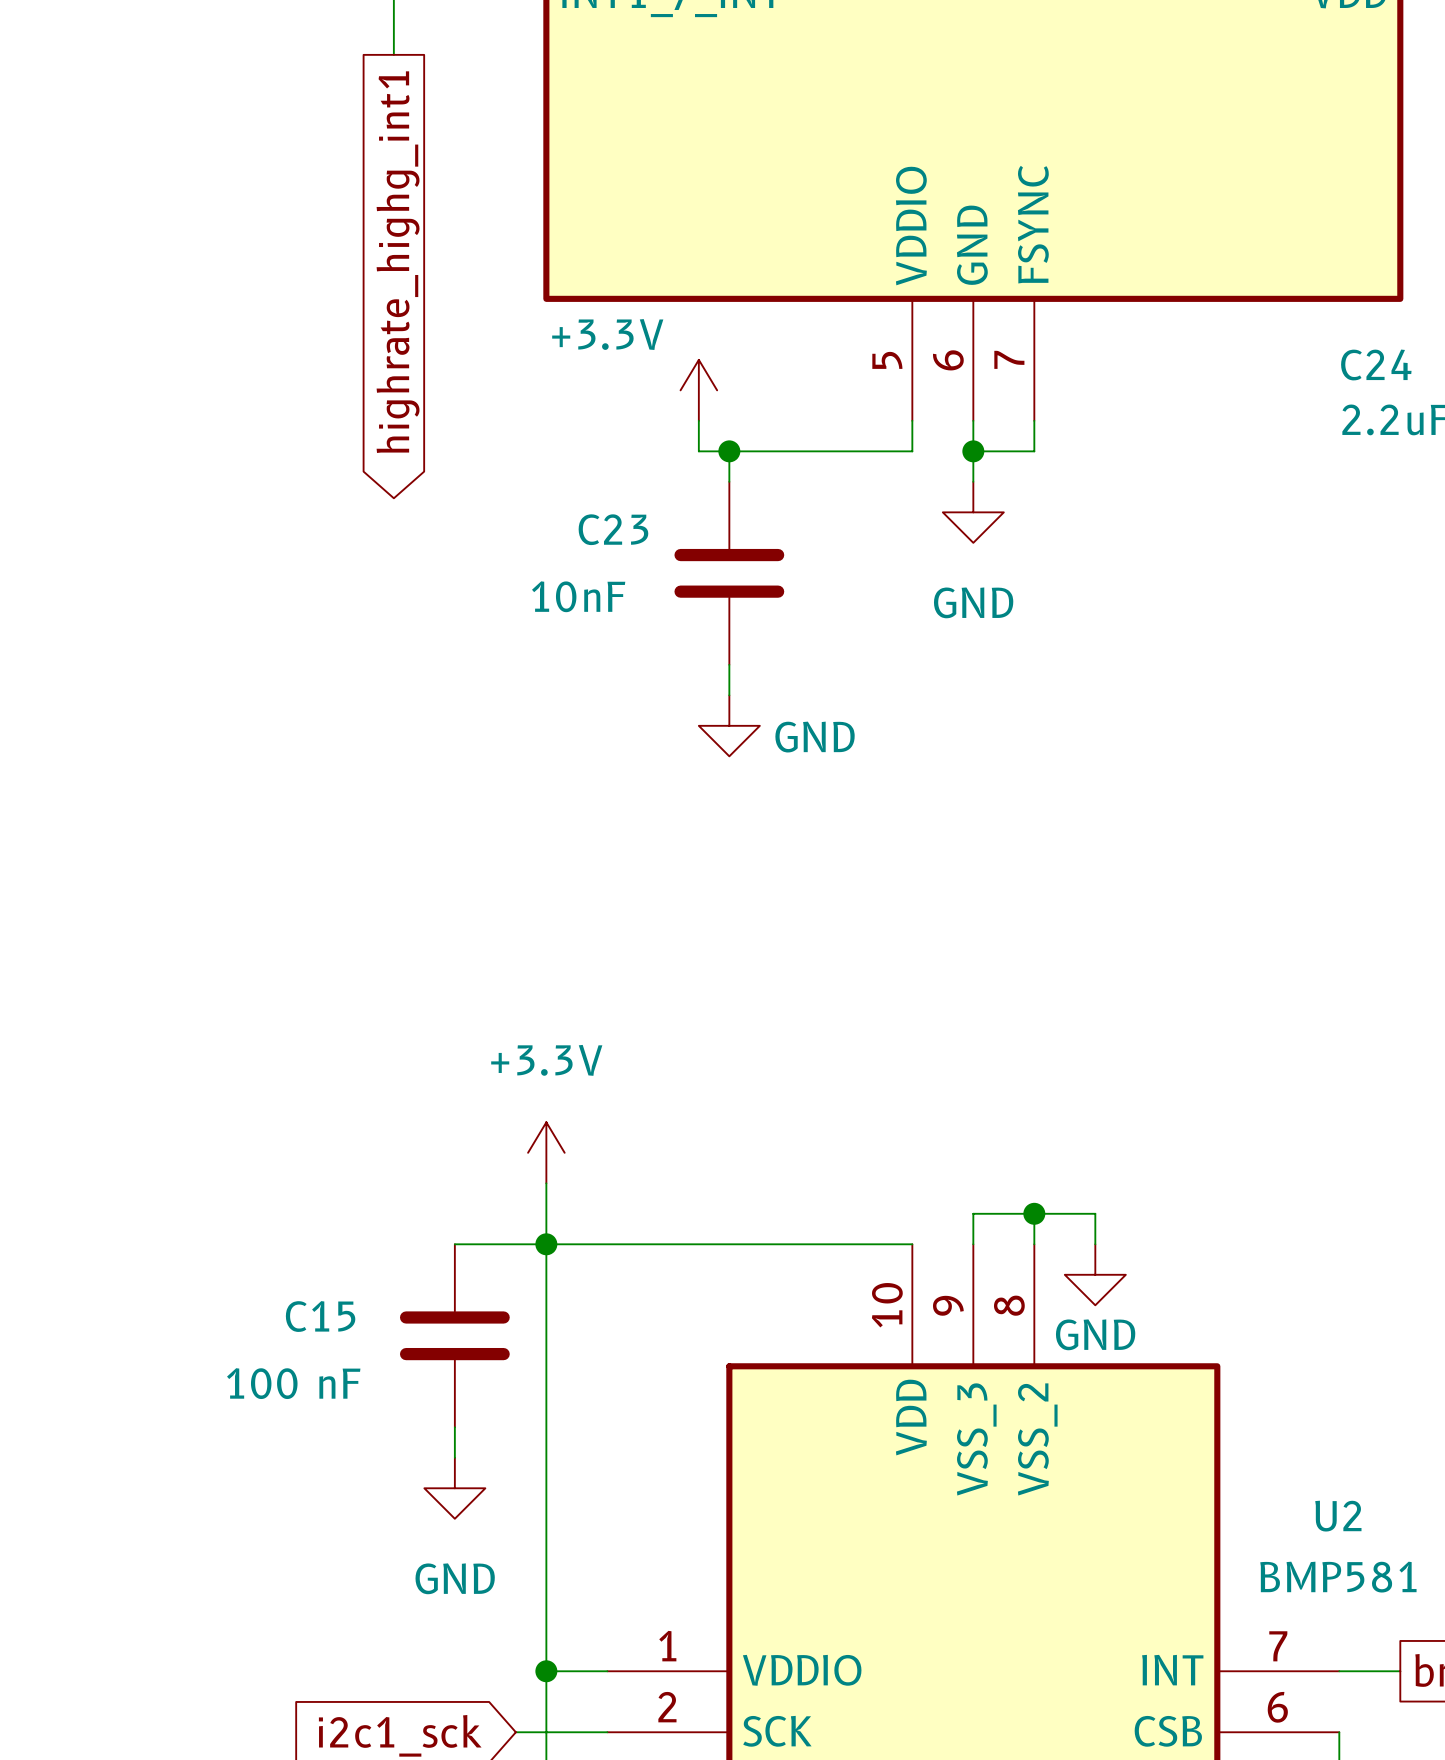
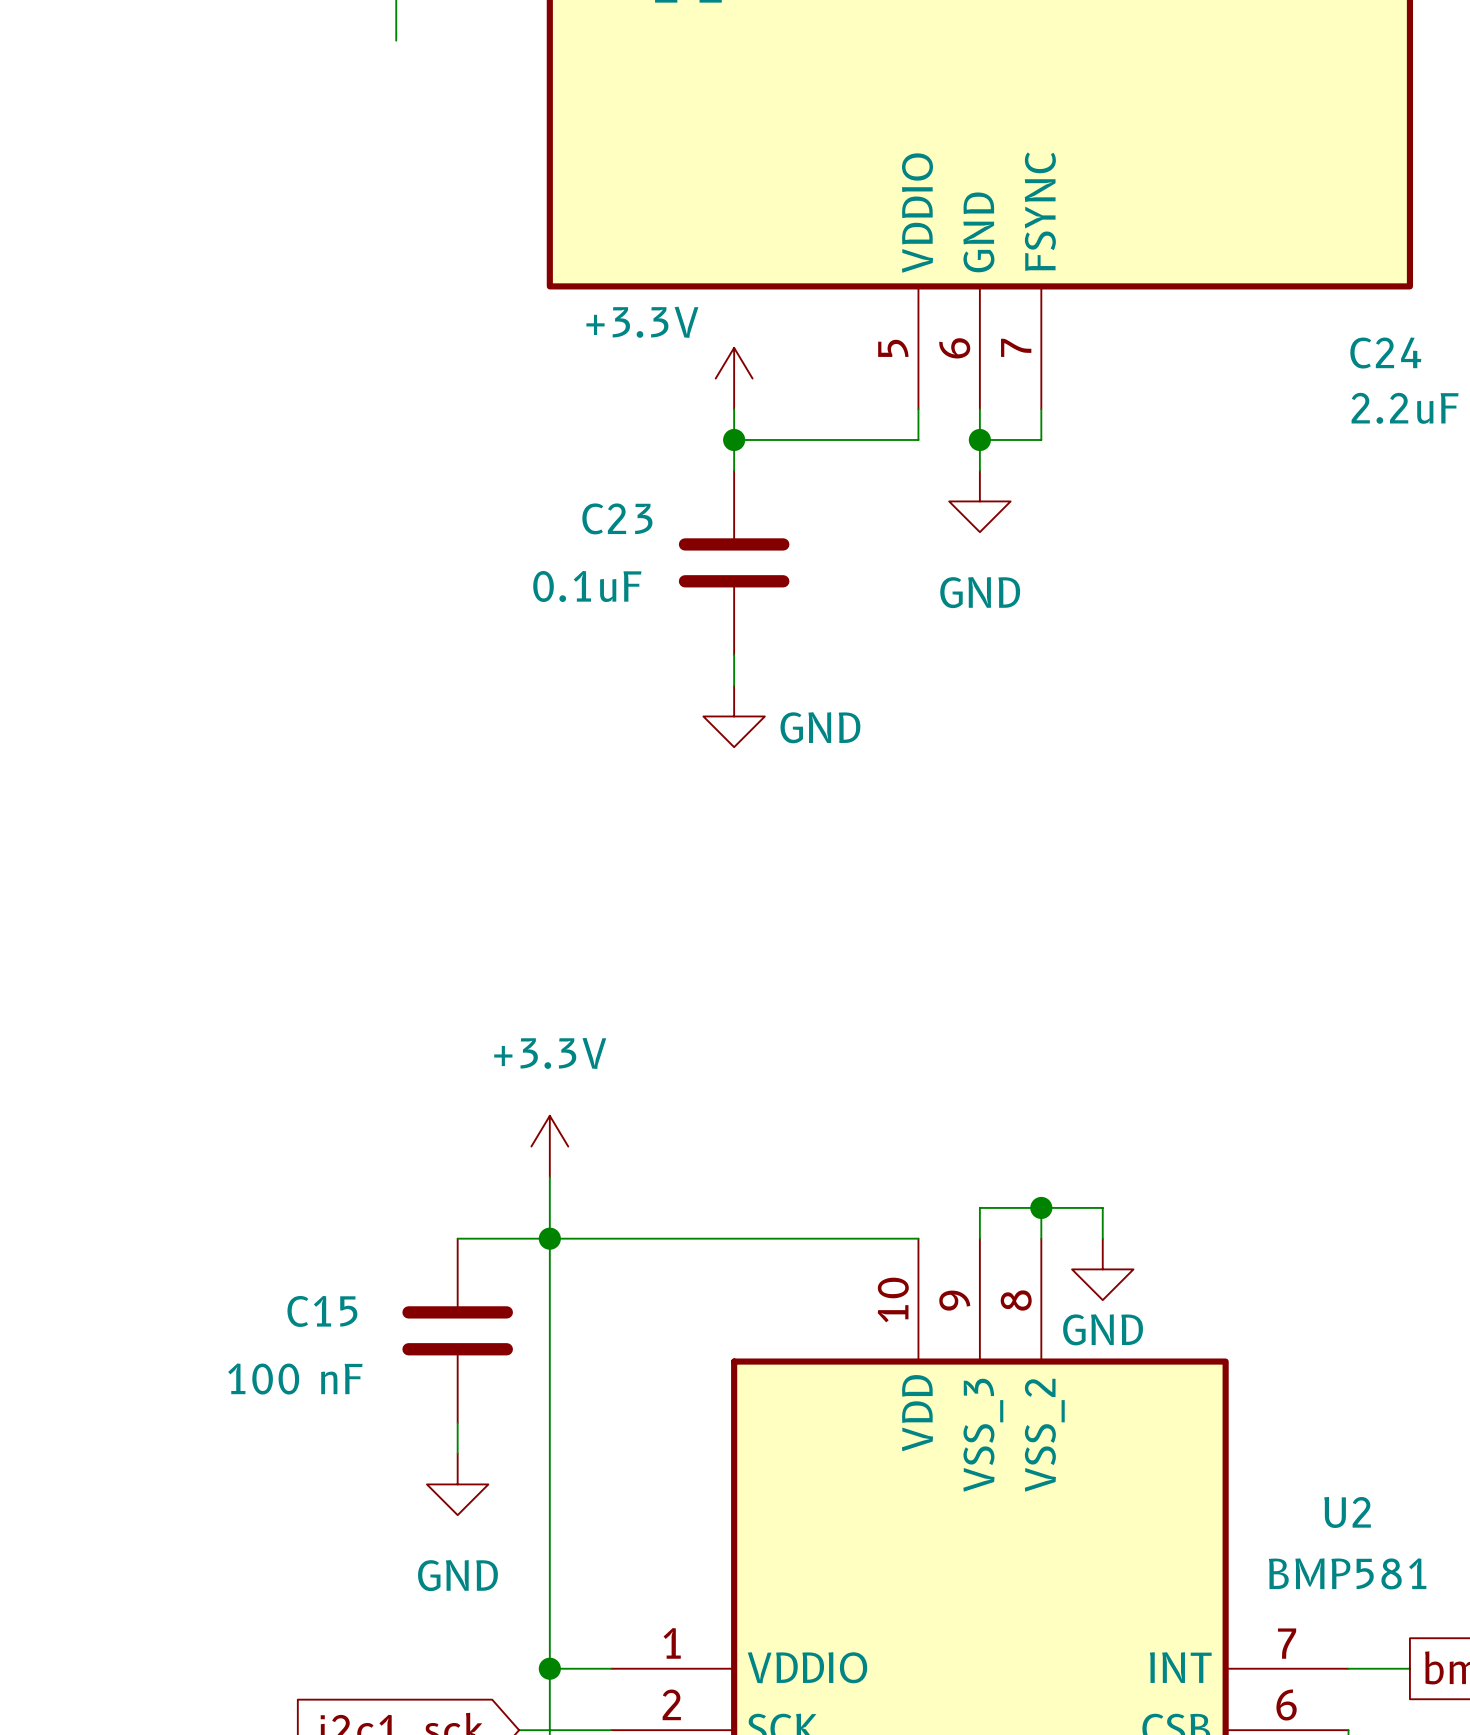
global label: highrate_highg_int1 (398, 262) -> none
power symbol position: +3.3V (698, 390) -> +3.3V (734, 378)
wire: (698, 420) (698, 451) (729, 451) -> (734, 409) (734, 439)
C23 value: 10nF (578, 596) -> 0.1uF (587, 586)

